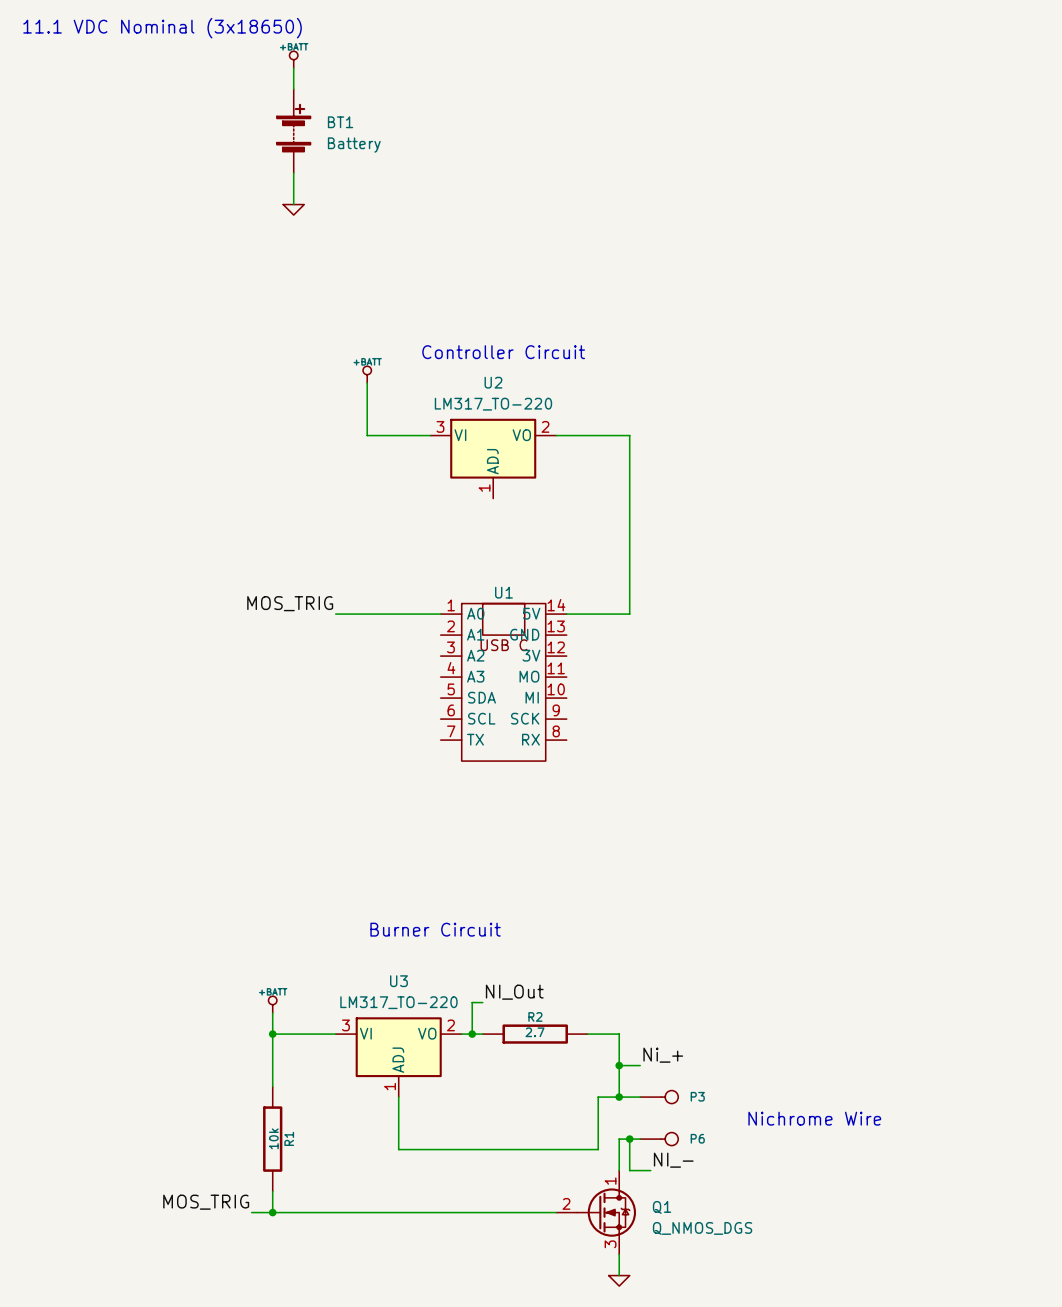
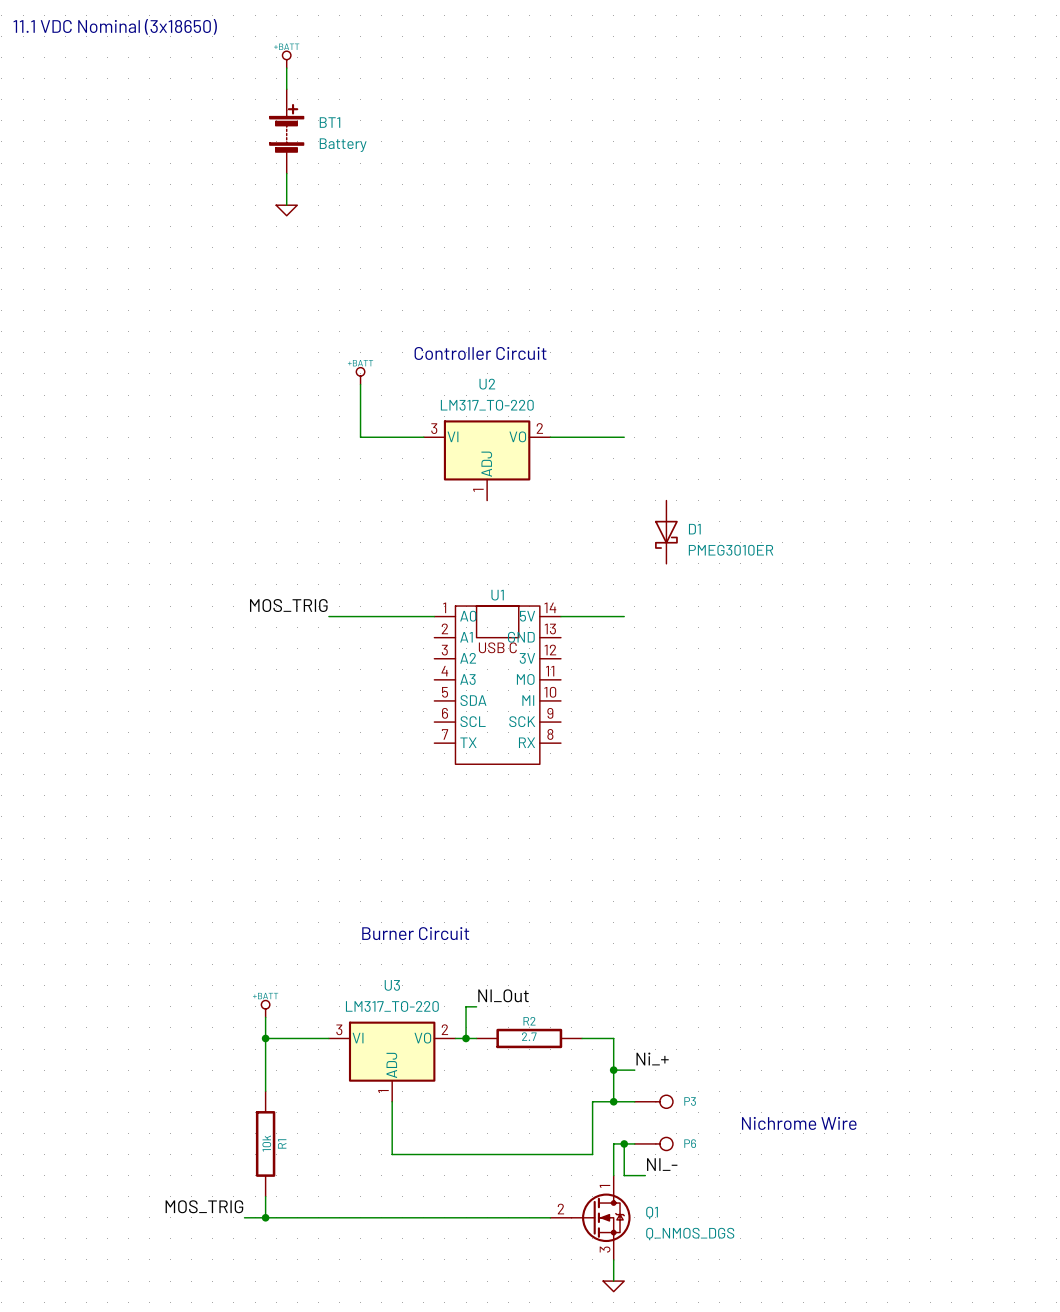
wire: (629, 435) (629, 614) -> none
D1: none -> PMEG3010ER (666, 532)

